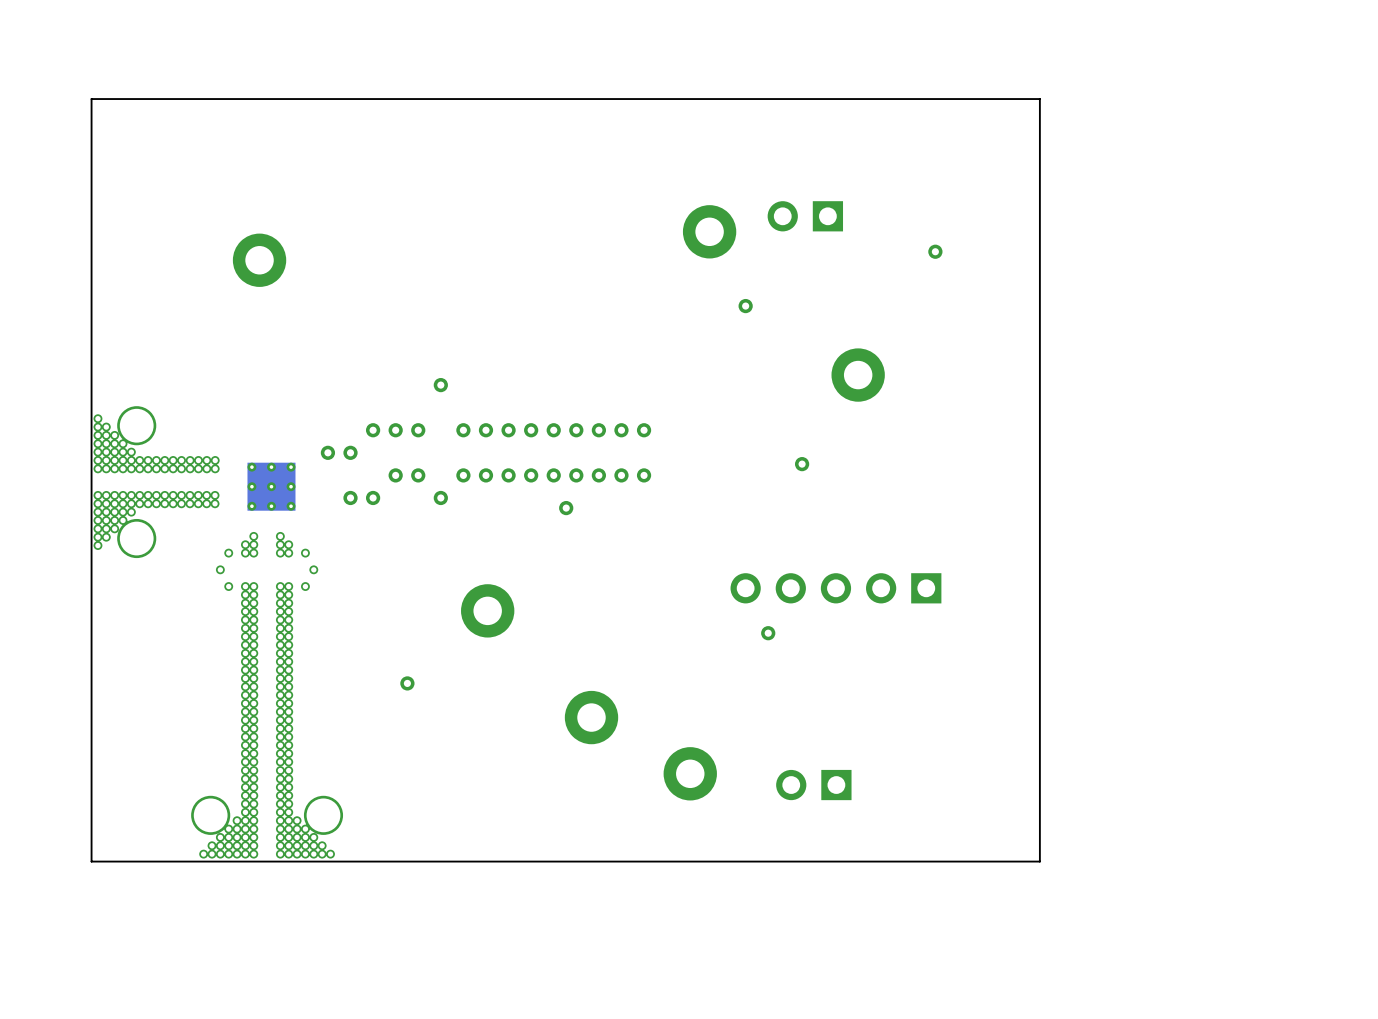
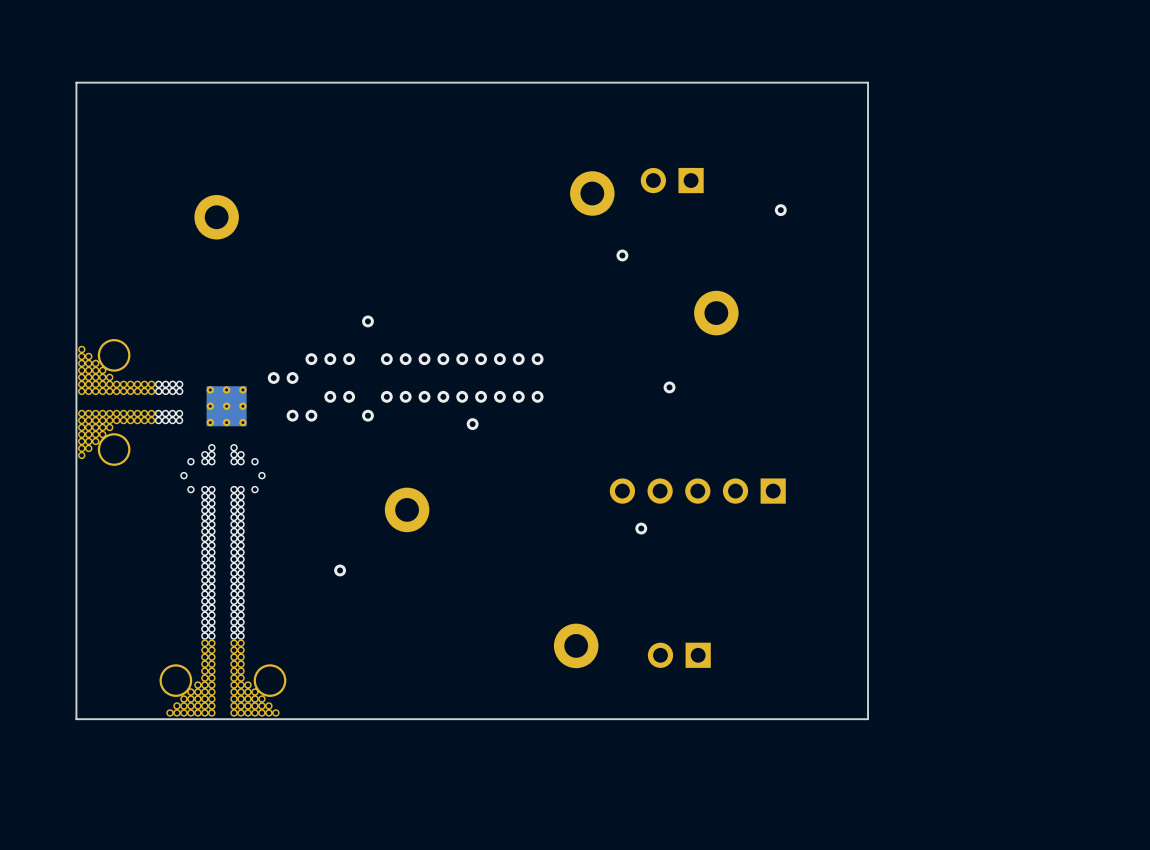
part: (591, 717) -> none

